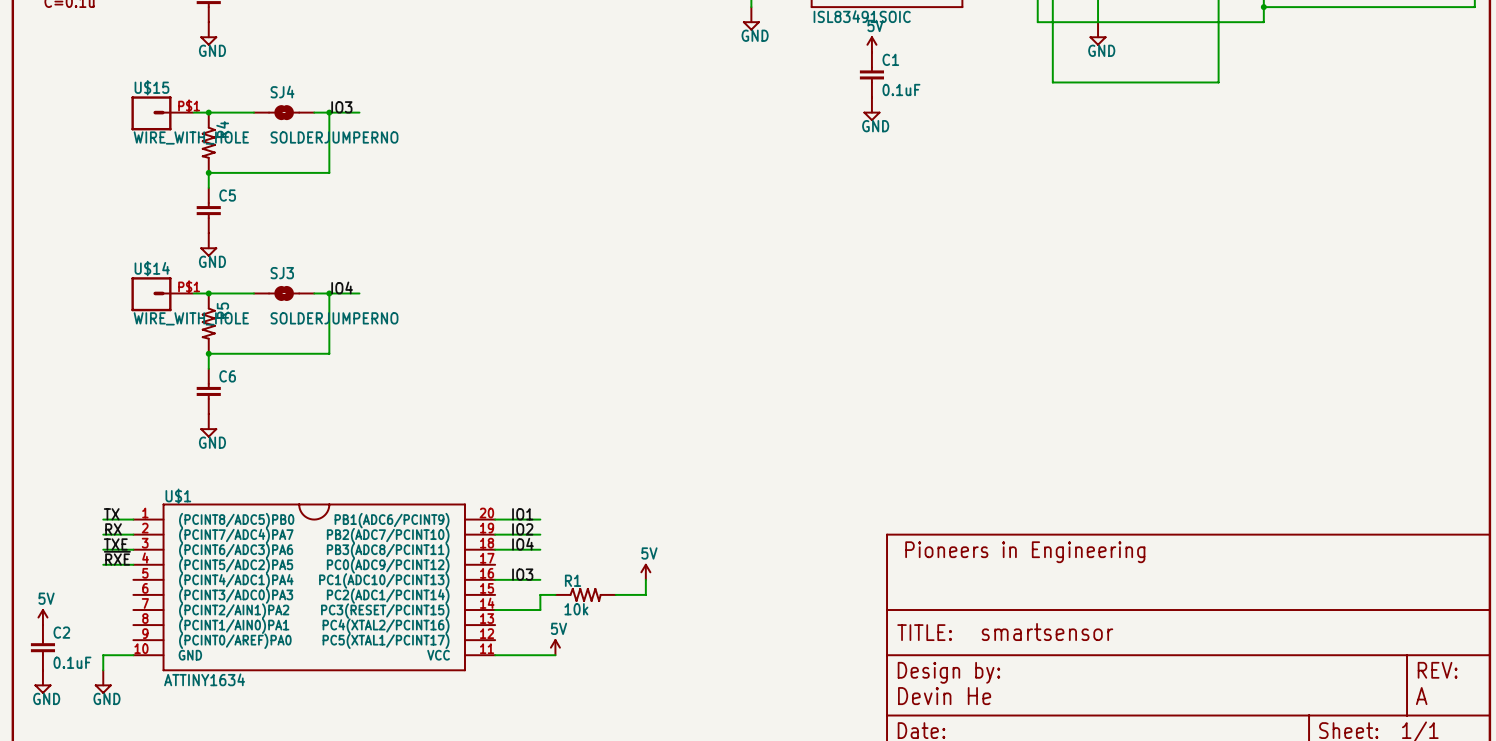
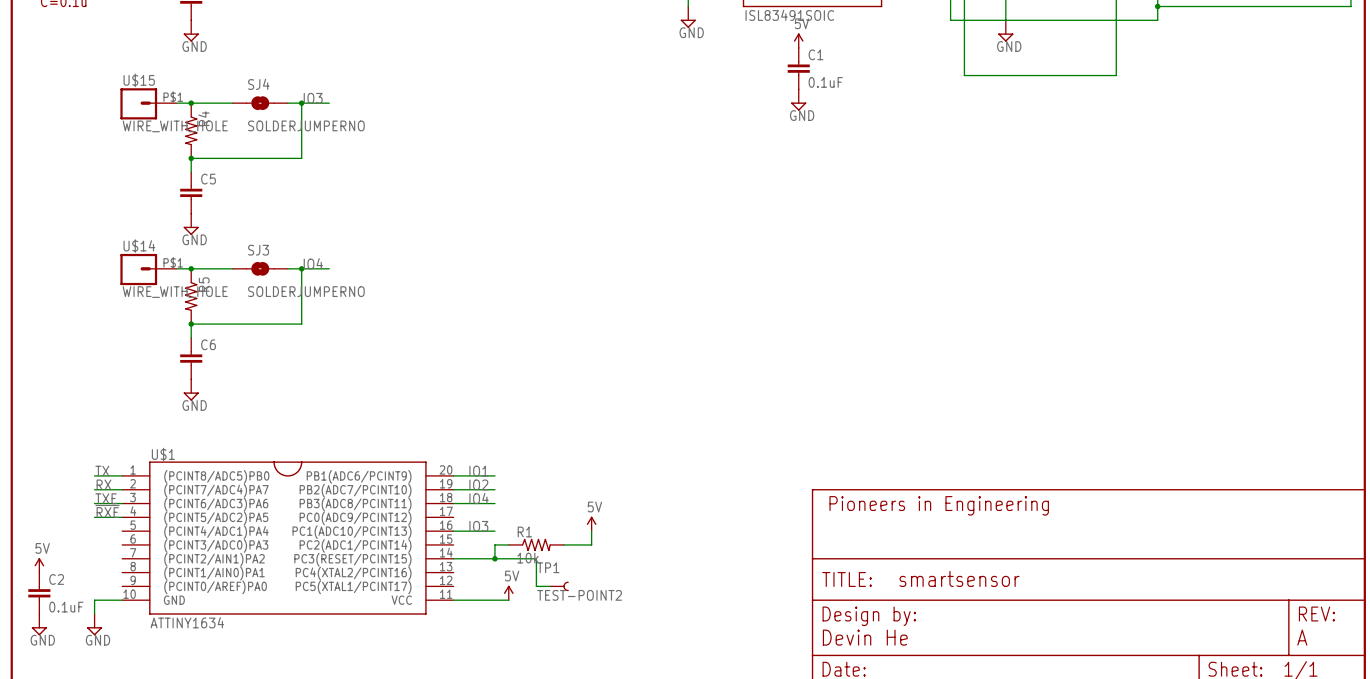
wire: none -> (494, 558) (536, 558) (536, 586) (550, 586)
junction: none -> (494, 558)
TP1: none -> TEST-POINT2 (559, 586)

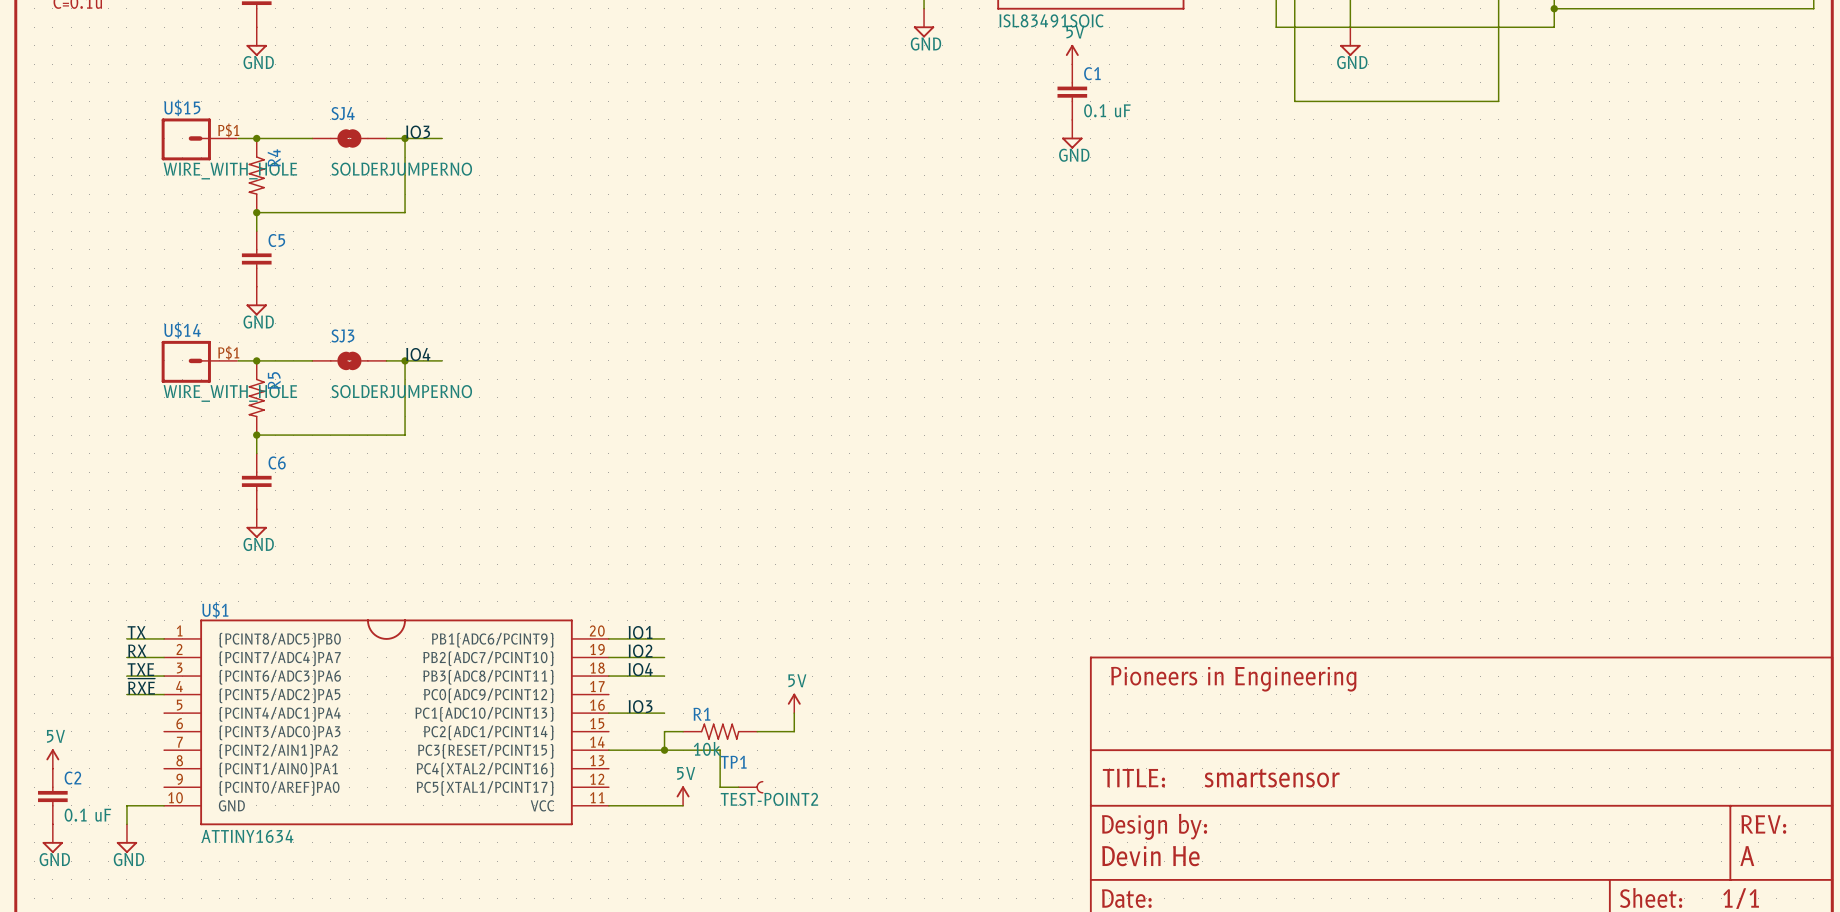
C1 value: 0.1uF (825, 82) -> 0.1 uF (1107, 110)
C2 value: 0.1uF (66, 607) -> 0.1 uF (87, 815)

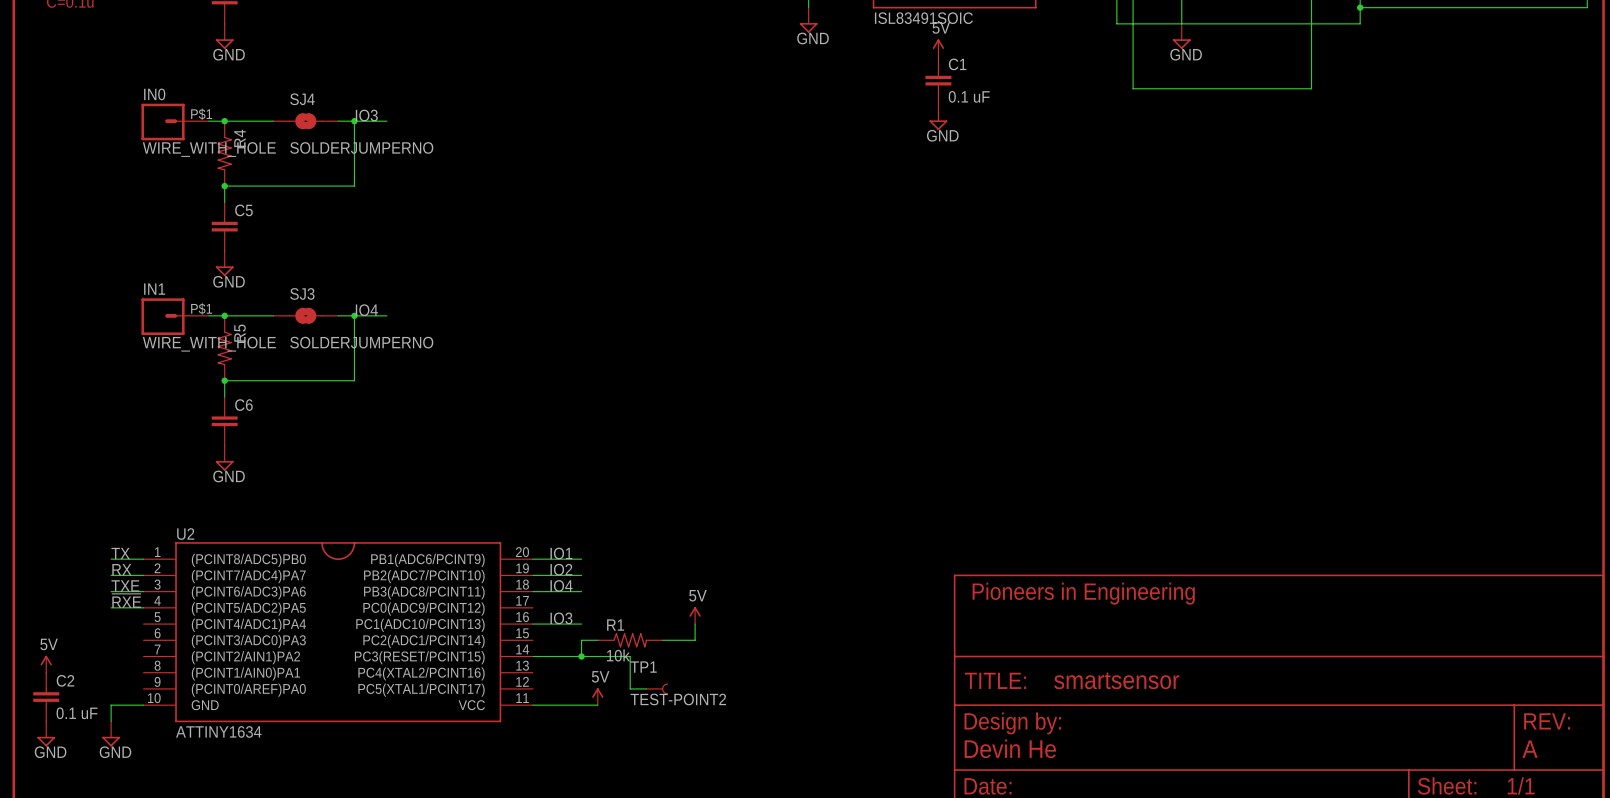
U$15 name: U$15 (182, 107) -> IN0 (154, 94)
U$14 name: U$14 (182, 330) -> IN1 (154, 289)
U$1 name: U$1 (215, 610) -> U2 (185, 534)

